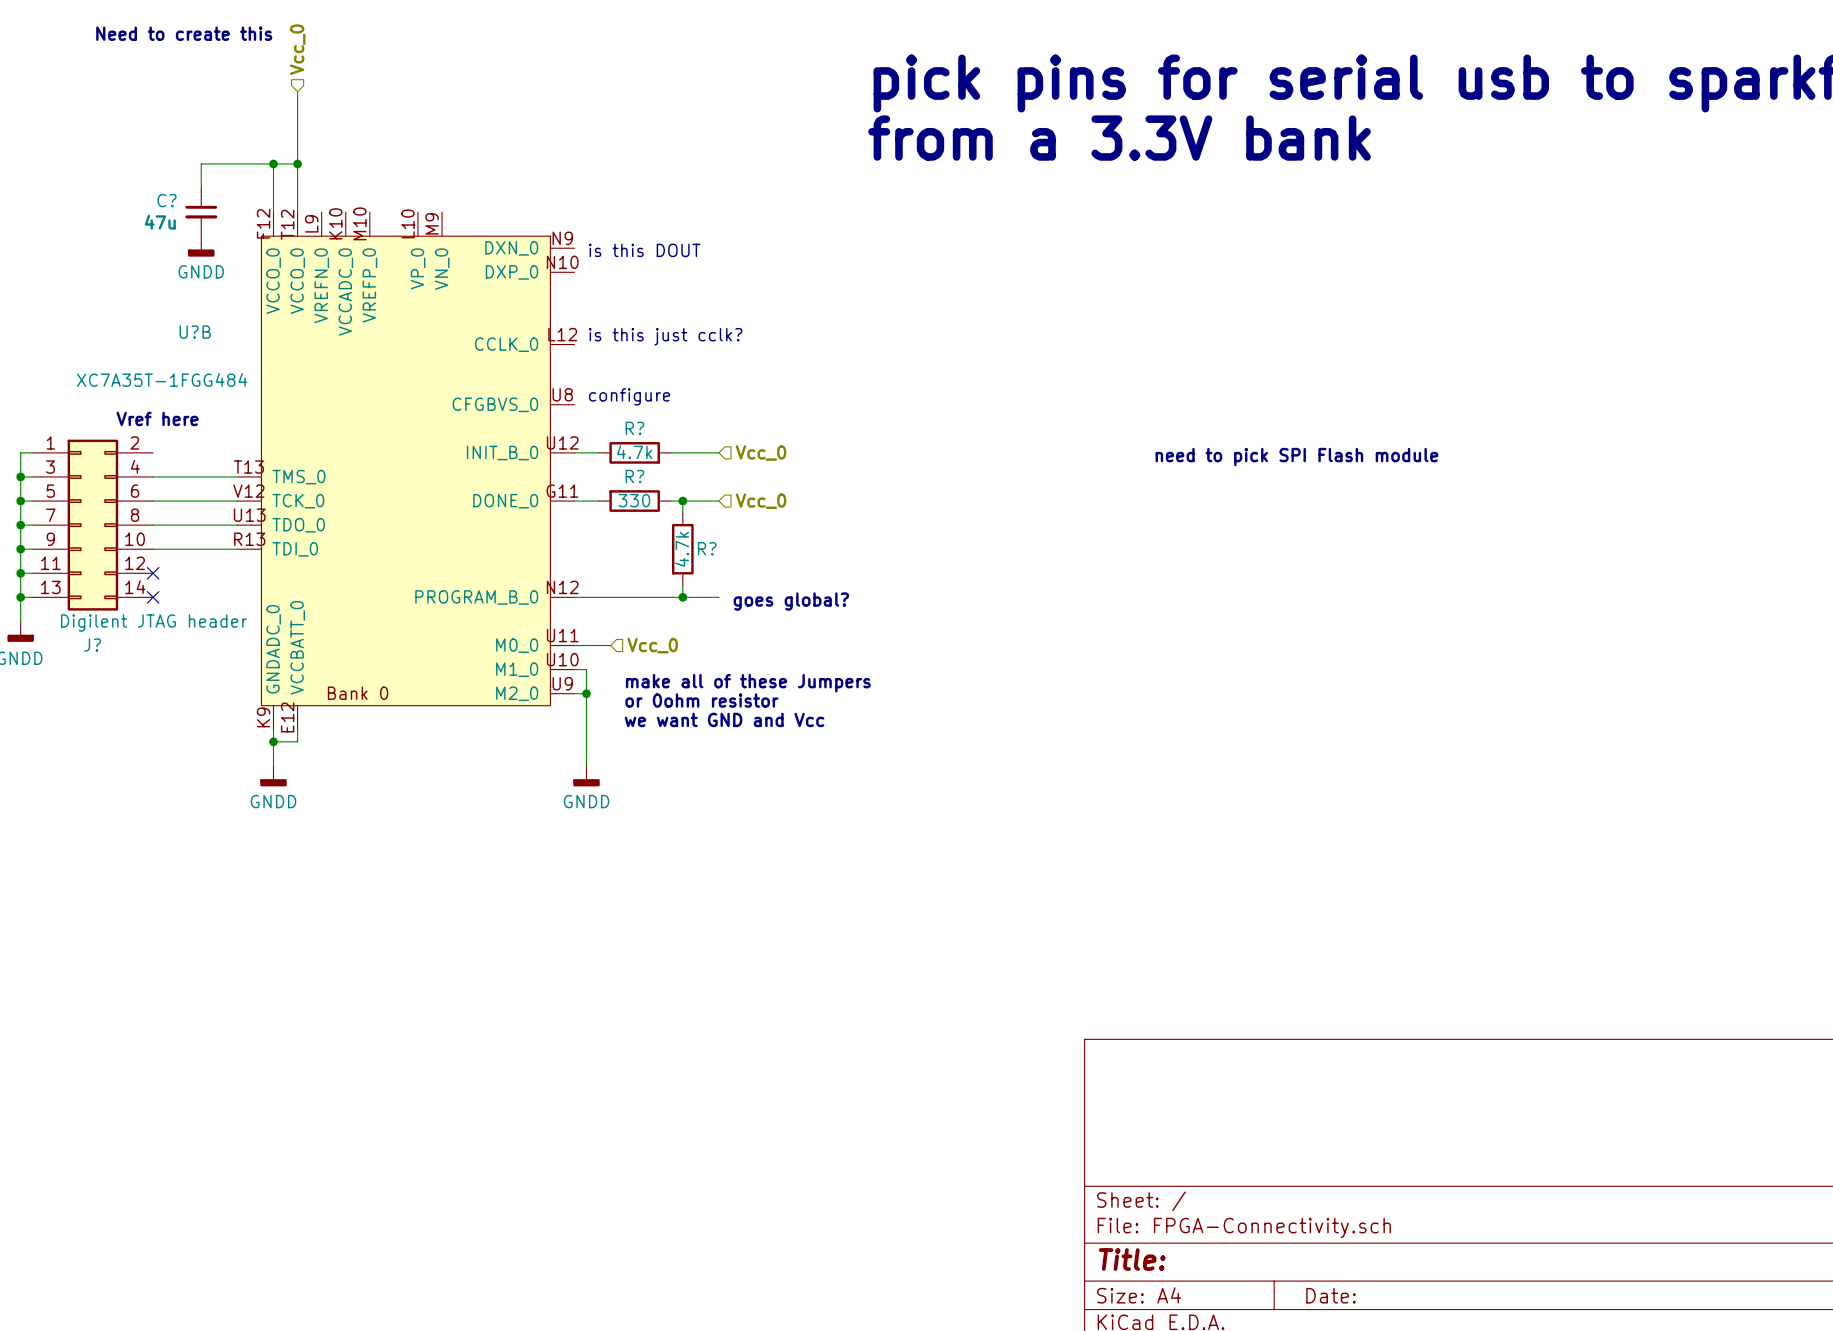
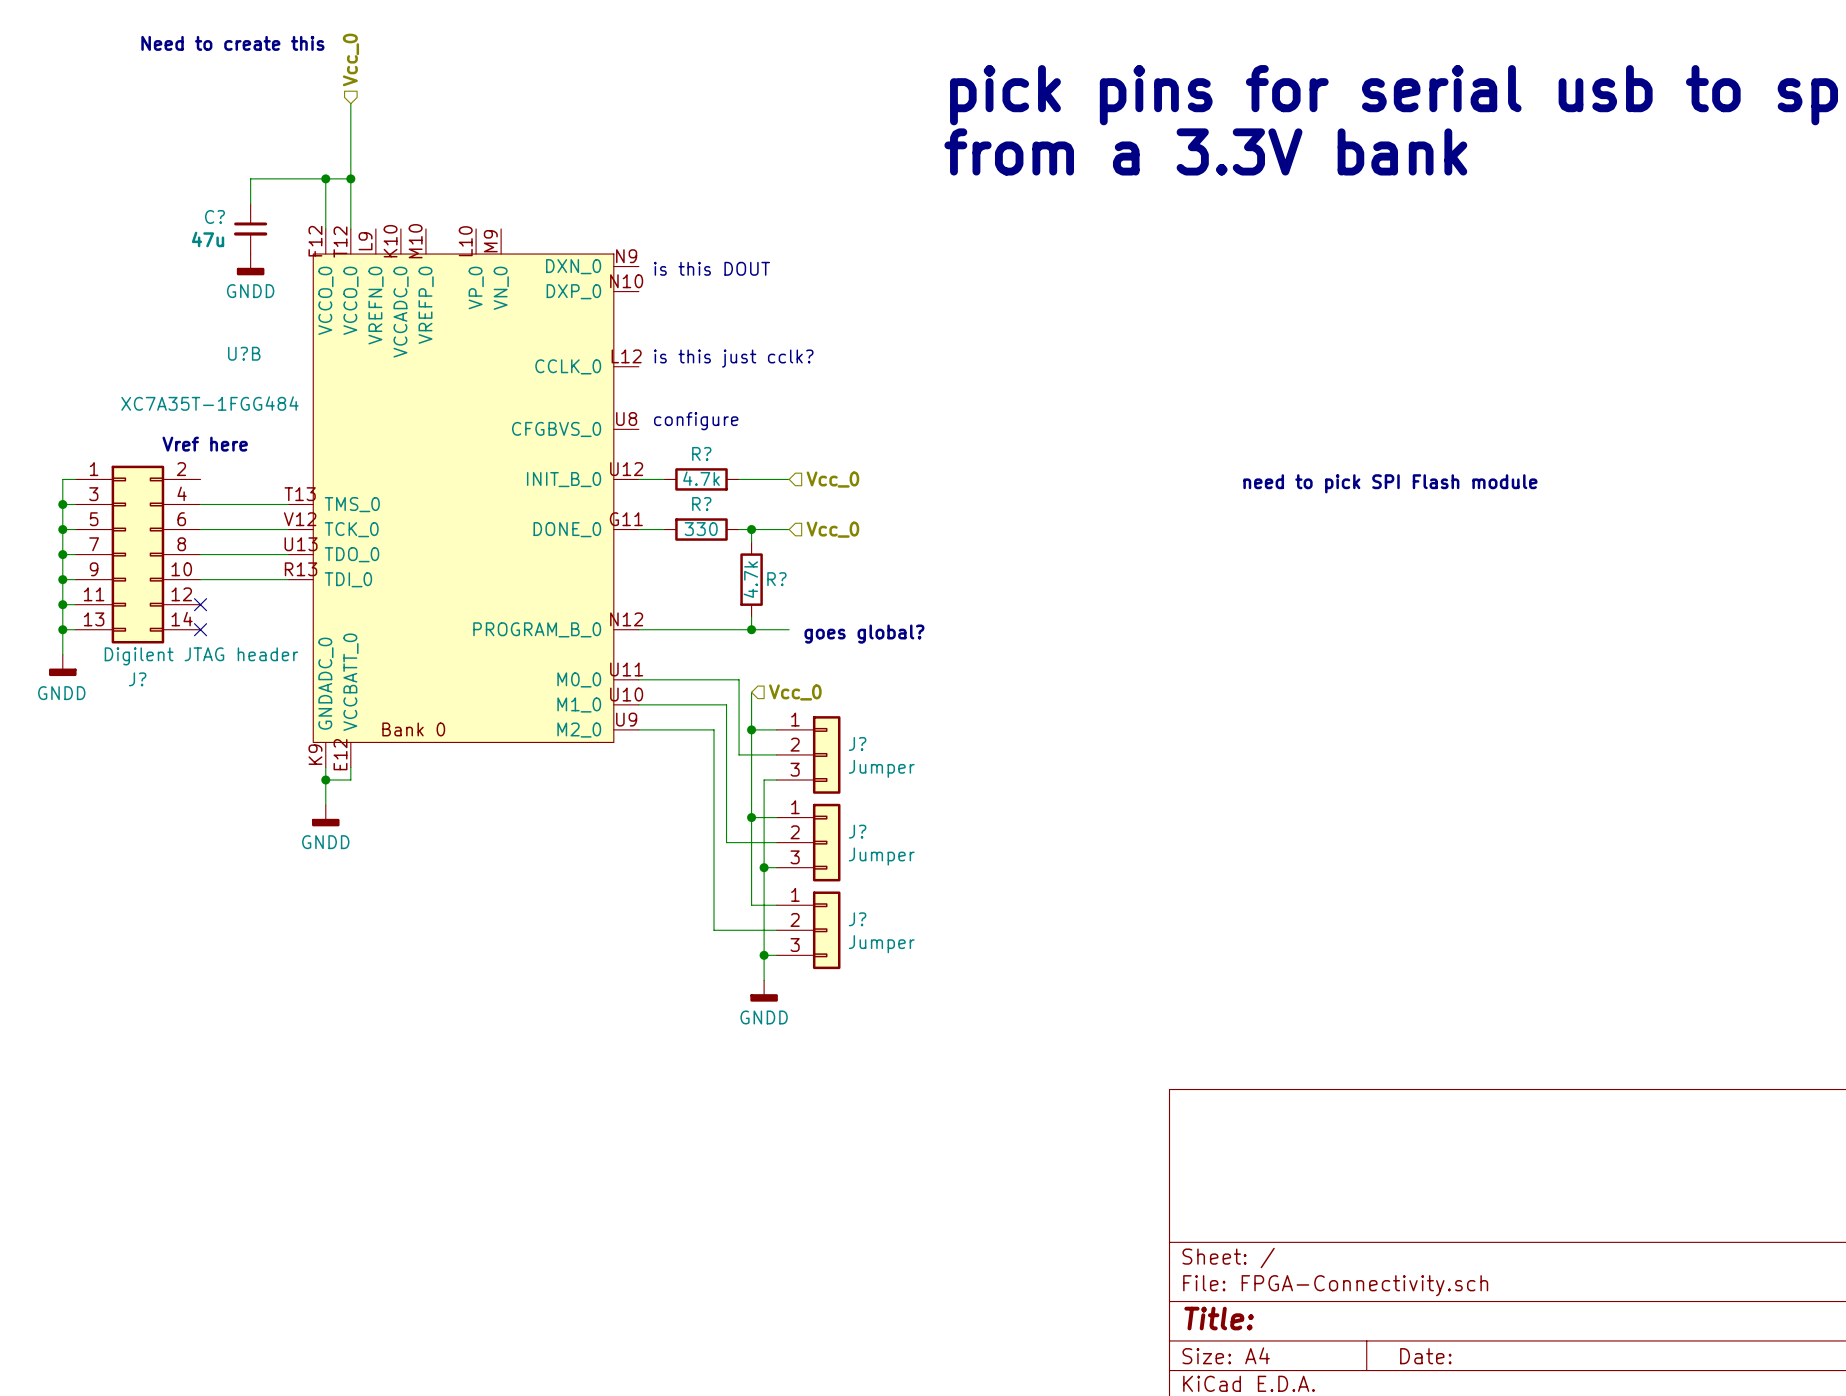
wire: none -> (676, 679) (739, 679) (739, 754) (776, 754)
hierarchical label position: Vcc_0 (652, 645) -> Vcc_0 (795, 692)
wire: none -> (751, 692) (751, 905) (776, 905)
wire: (586, 669) (586, 765) -> (651, 704) (726, 704) (726, 842) (776, 842)
text: make all of these Jumpers (748, 683) -> none
wire: none -> (651, 729) (714, 729) (714, 930) (776, 930)
junction: (586, 693) -> none
wire: none -> (751, 729) (776, 729)
junction: none -> (751, 729)
text: or 0ohm resistor (701, 700) -> none
J?: none -> Jumper (808, 754)
text: we want GND and Vcc (724, 719) -> none
wire: none -> (776, 780) (764, 780) (764, 980)
power symbol position: GNDD (586, 776) -> GNDD (764, 991)
wire: none -> (751, 817) (776, 817)
junction: none -> (751, 817)
J?: none -> Jumper (808, 842)
wire: none -> (764, 867) (776, 867)
junction: none -> (764, 867)
J?: none -> Jumper (808, 930)
wire: none -> (764, 955) (776, 955)
junction: none -> (764, 955)

